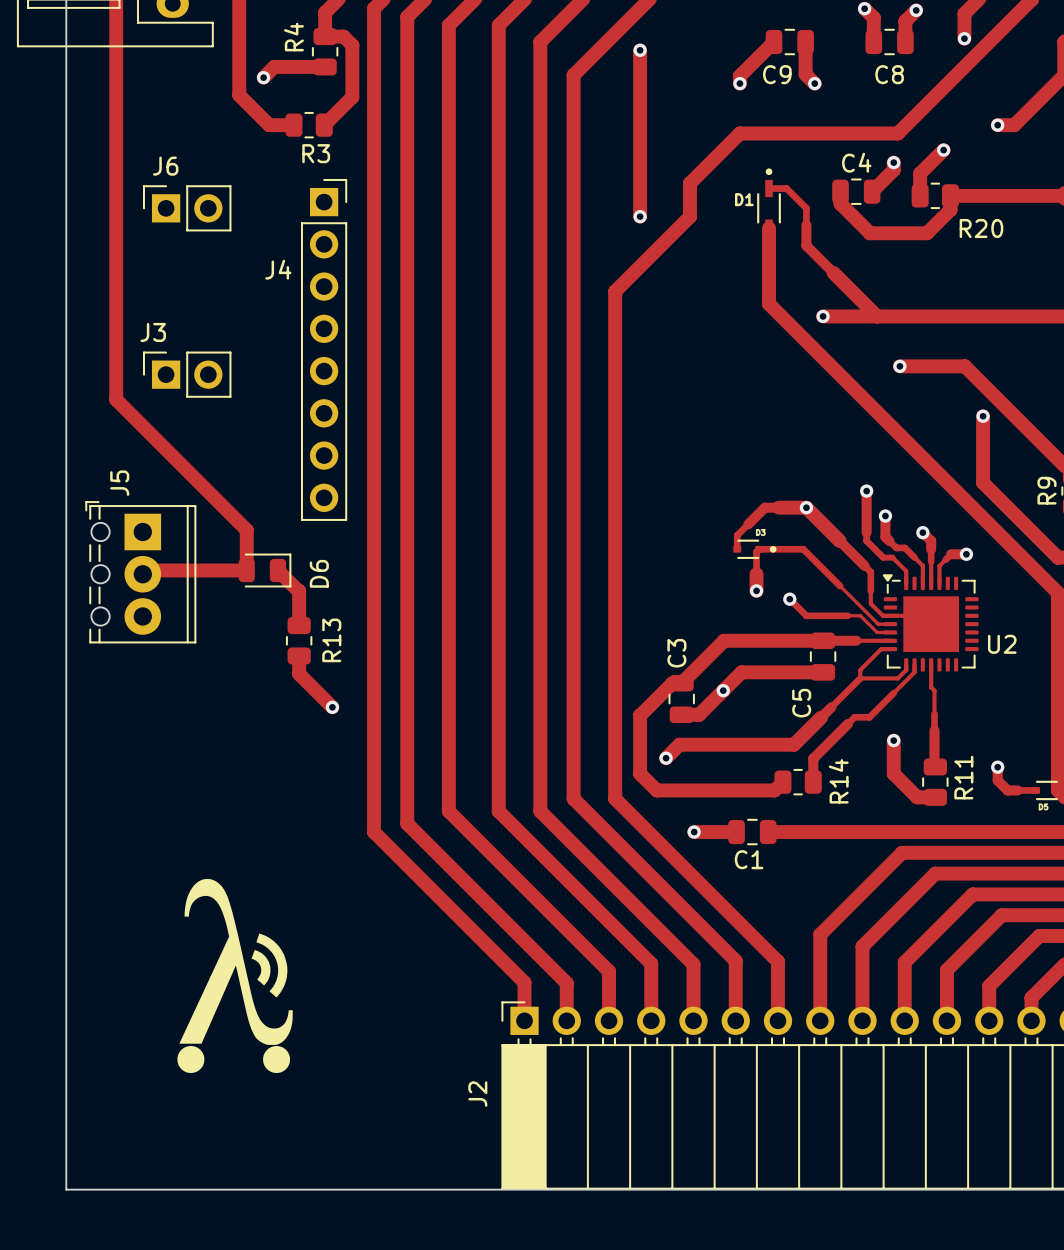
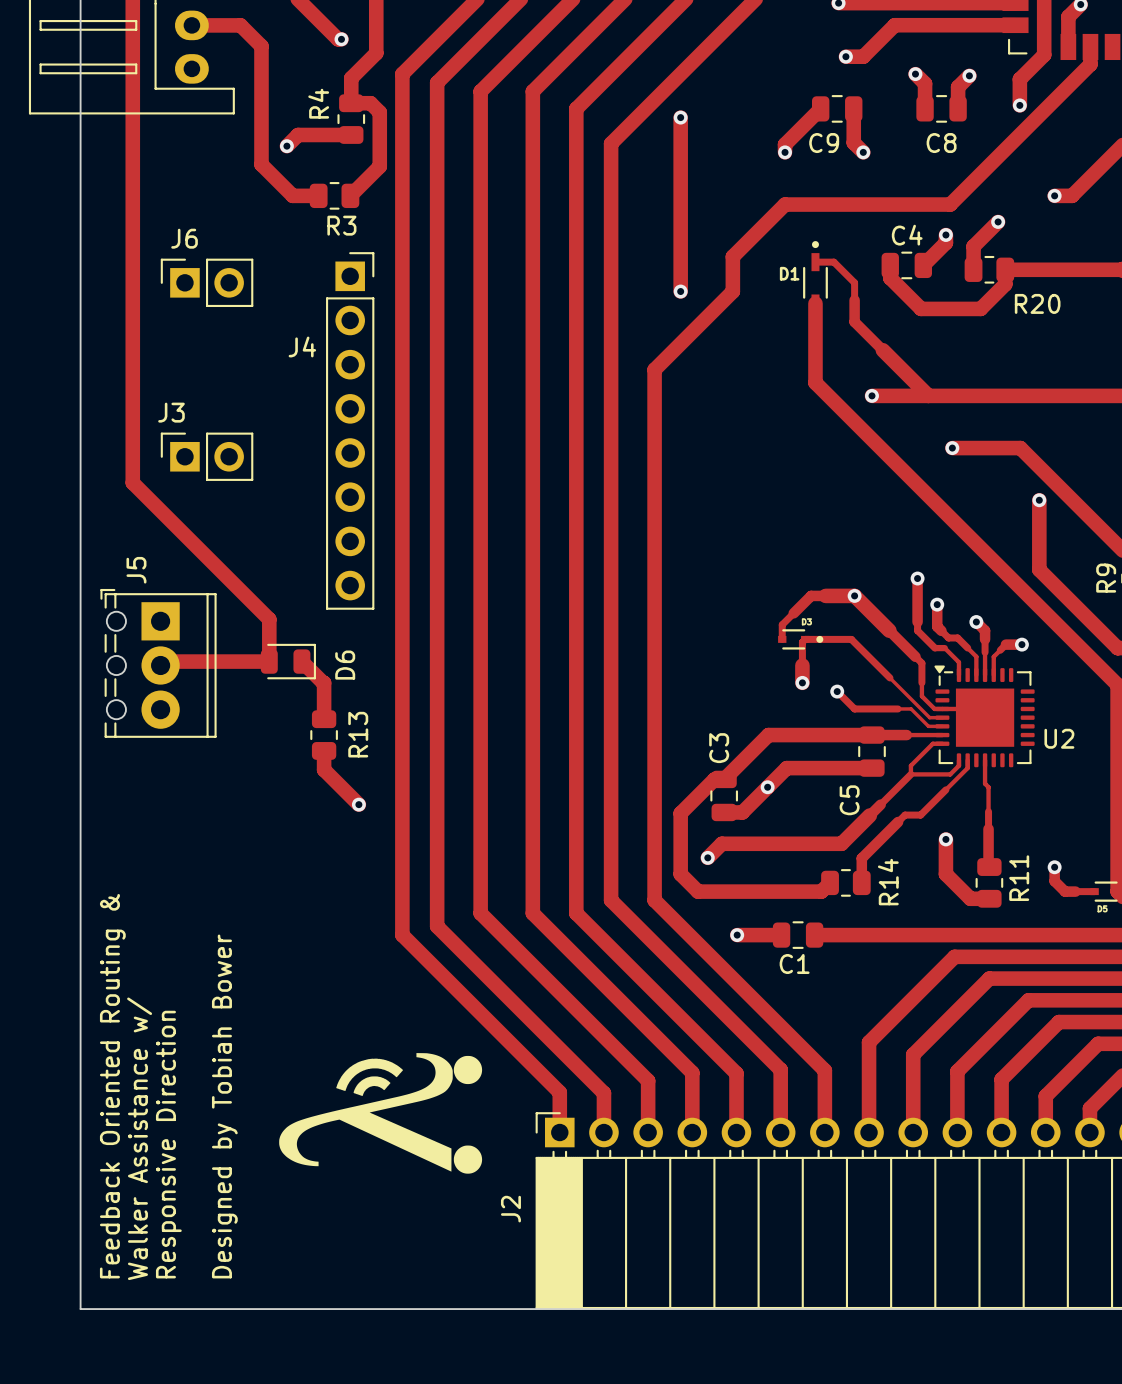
drawing: [177, 878, 293, 1074] -> none
drawing: none -> [279, 1053, 483, 1174]
text: none -> Feedback Oriented Routing & (112, 1086)
text: none -> Designed by Tobiah Bower (224, 1106)
text: none -> Walker Assistance w/ (139, 1138)
text: none -> Responsive Direction (168, 1144)

